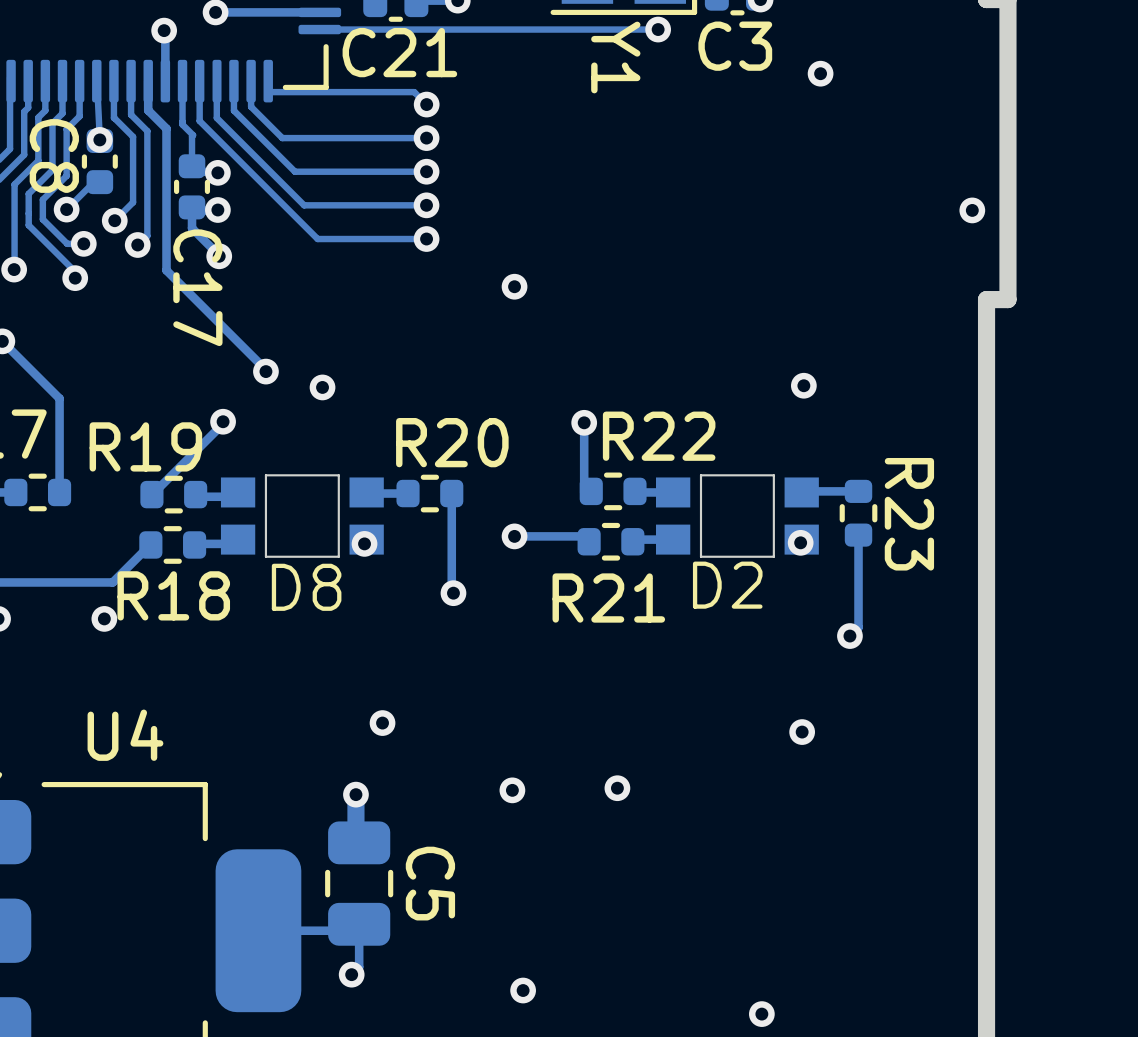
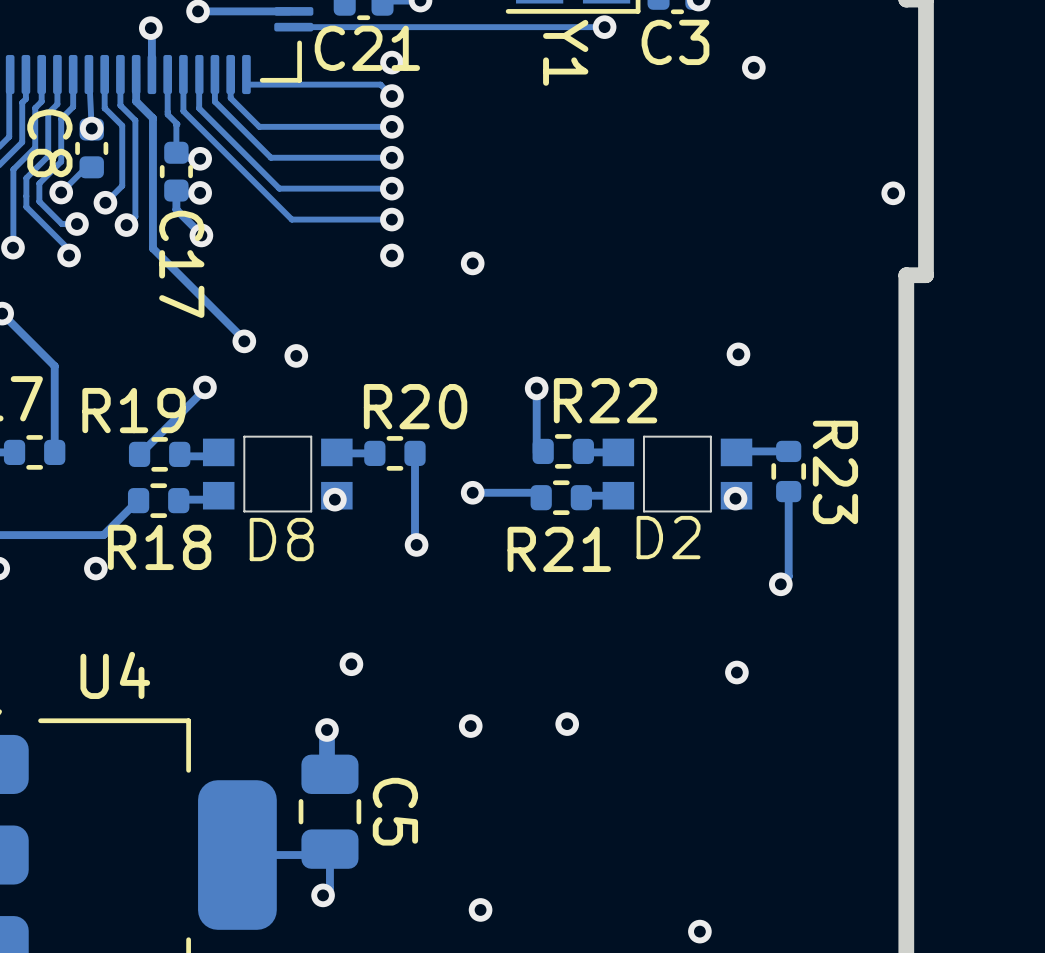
via: none -> (391, 62)
via: none -> (391, 255)

